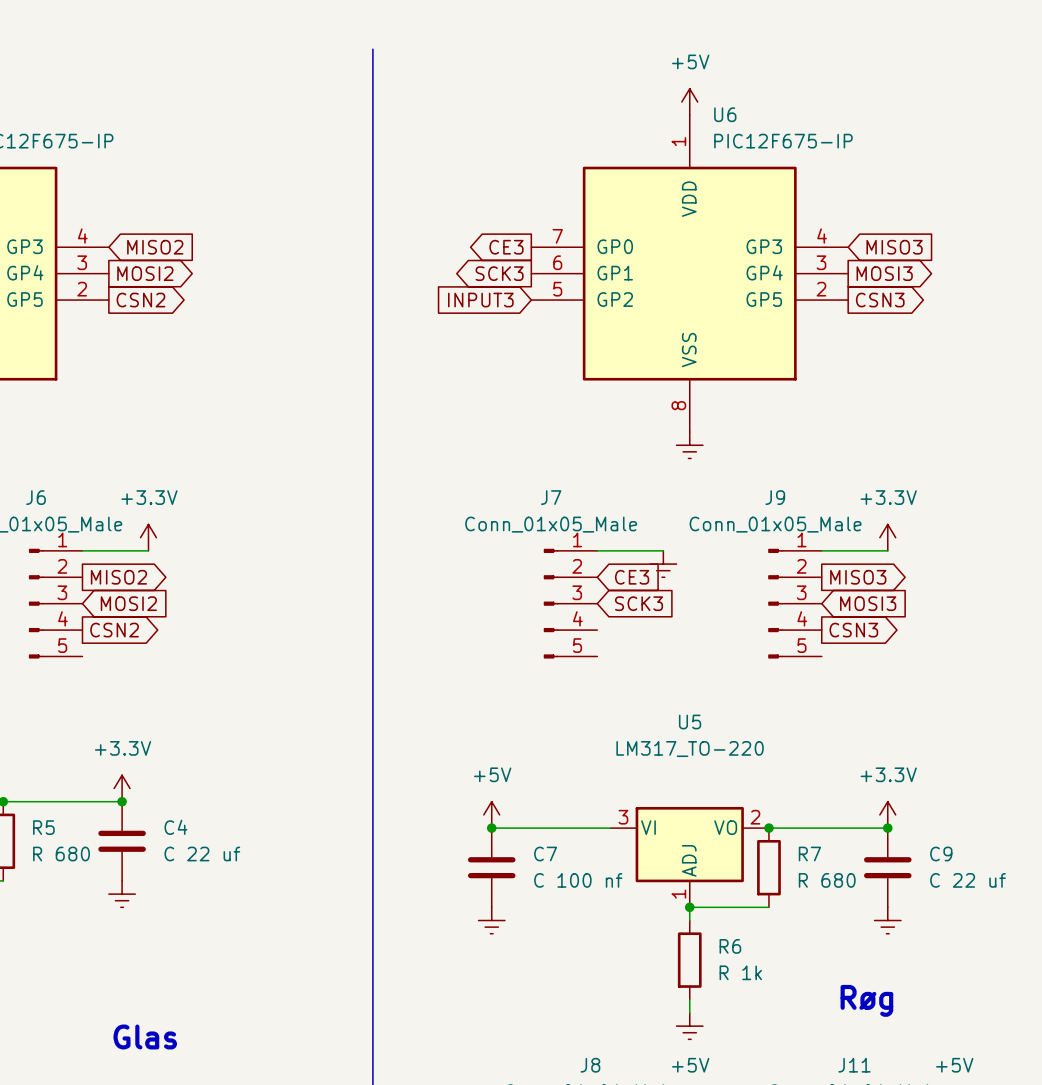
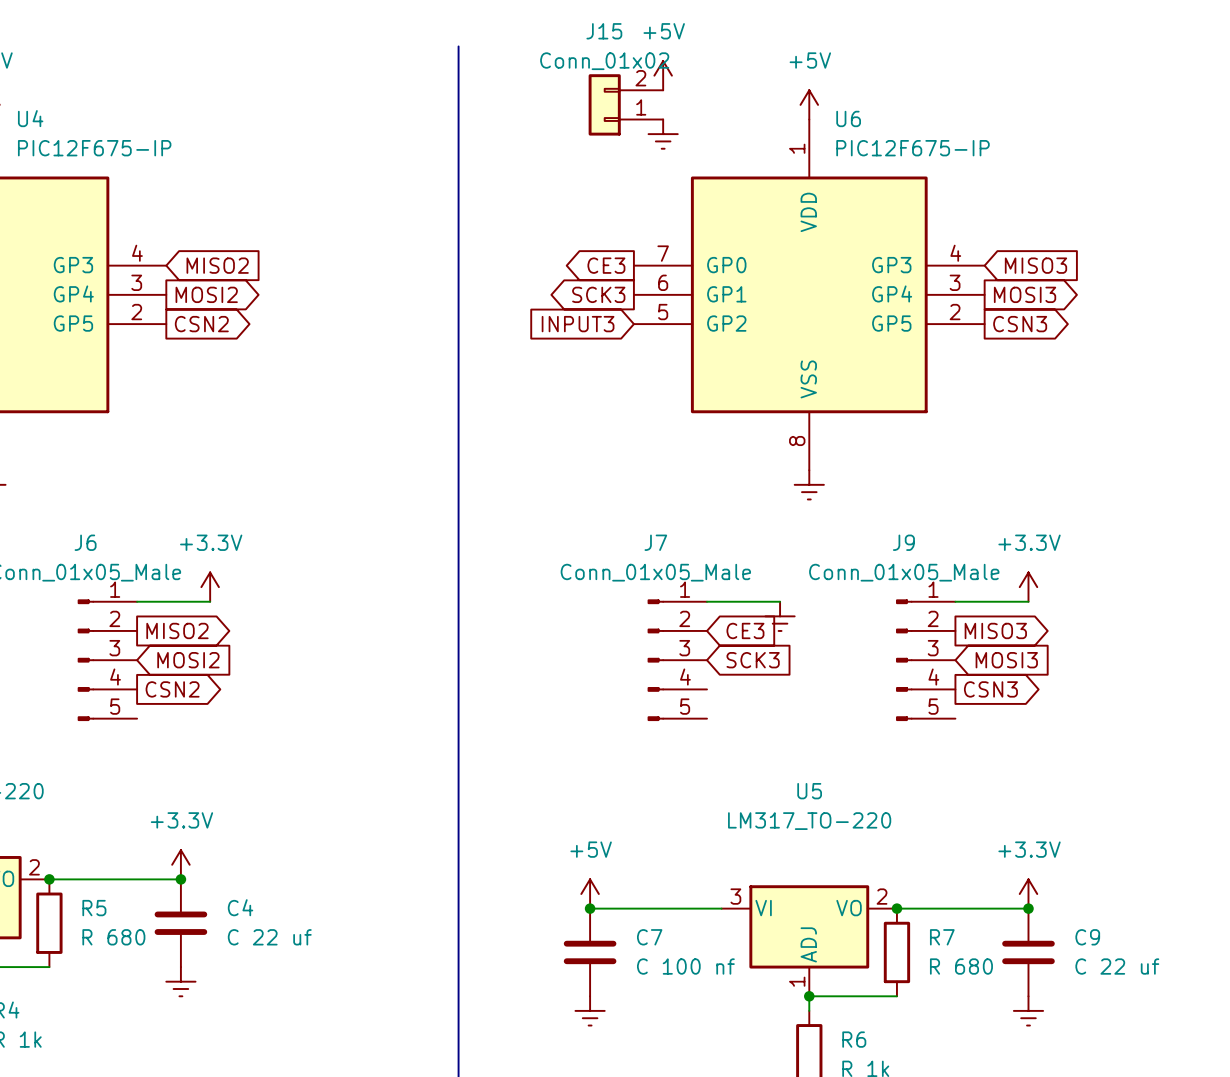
power symbol: none -> +5V (663, 75)
J15: none -> Conn_01x02 (625, 104)
power symbol: none -> (663, 134)

